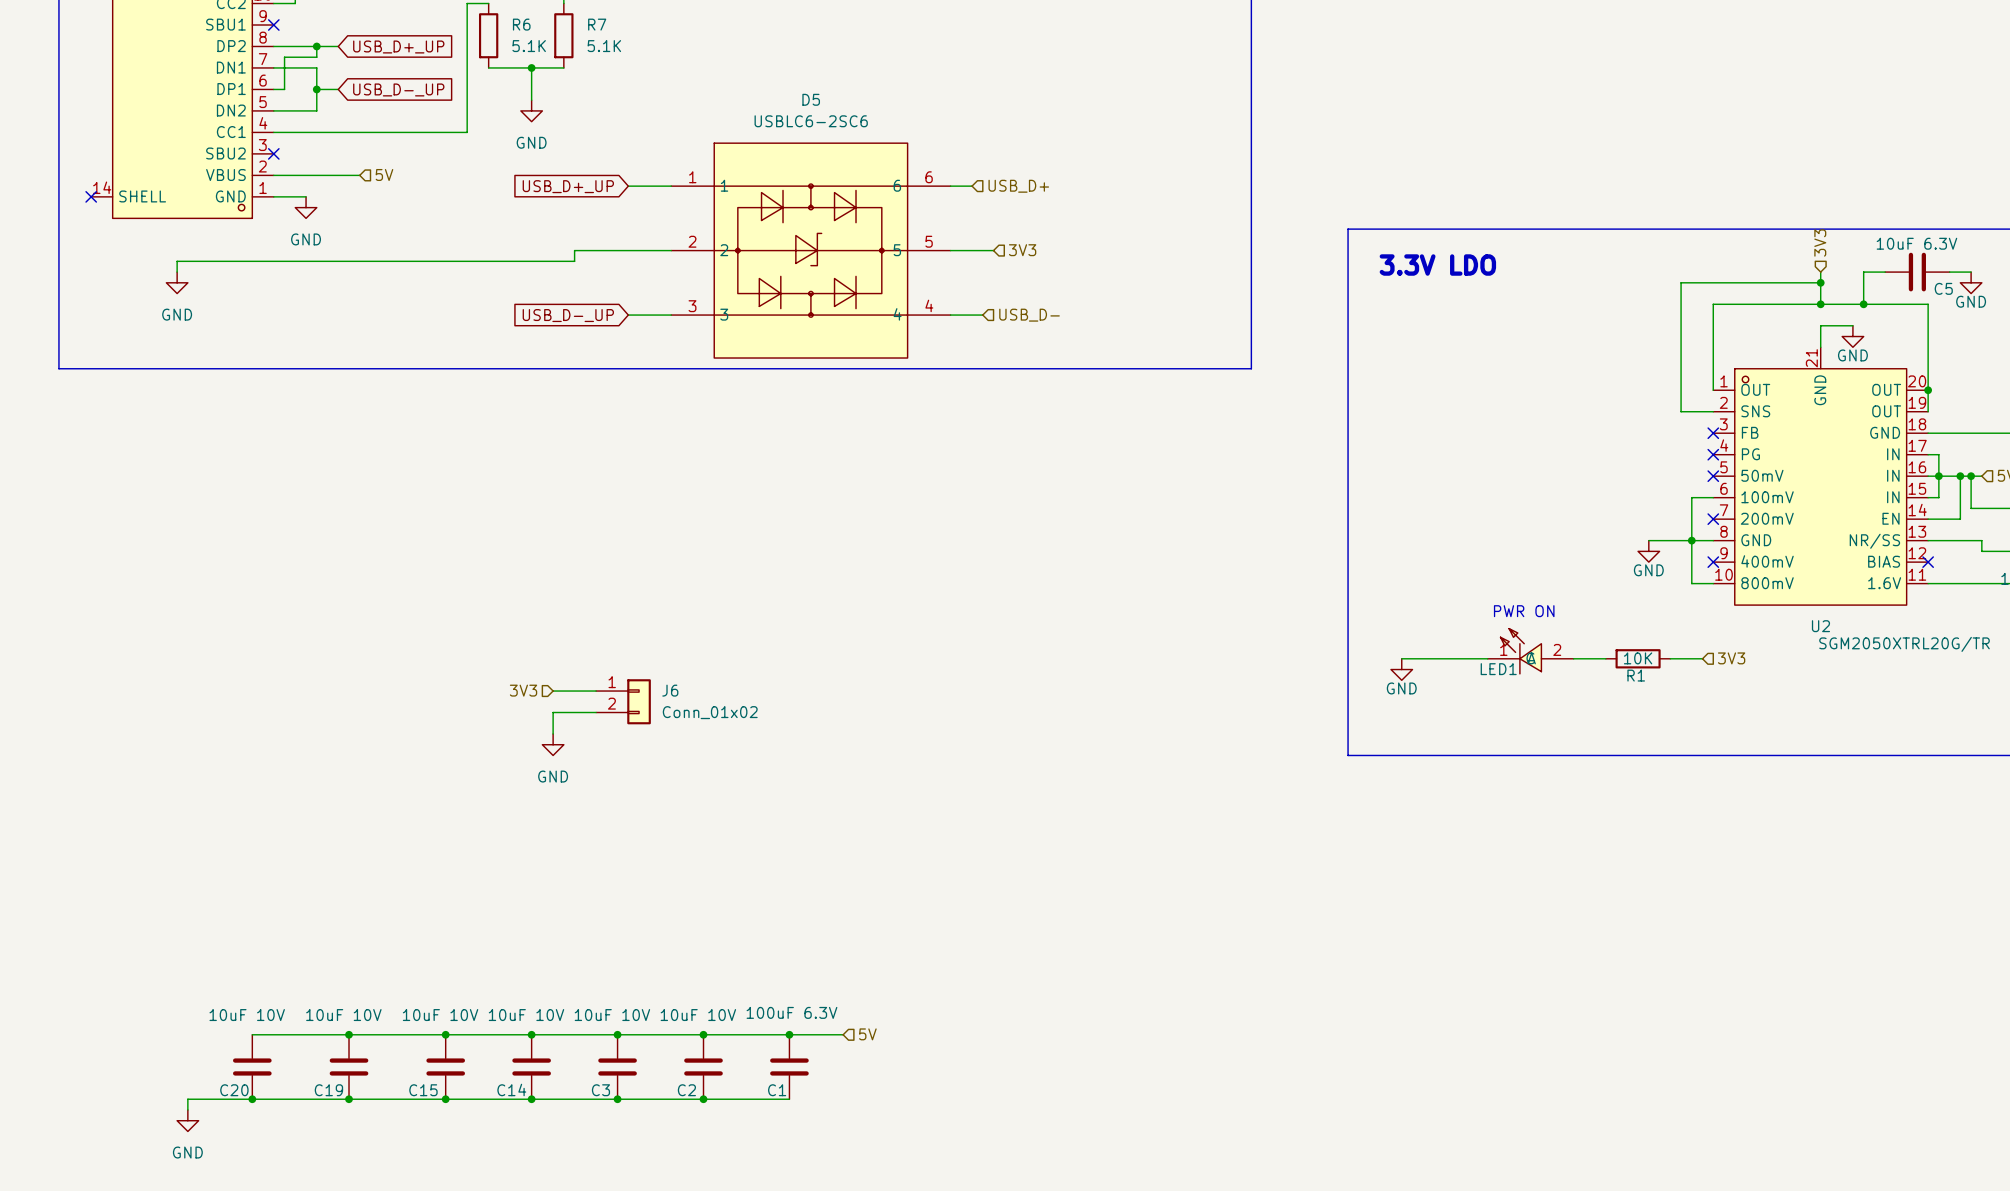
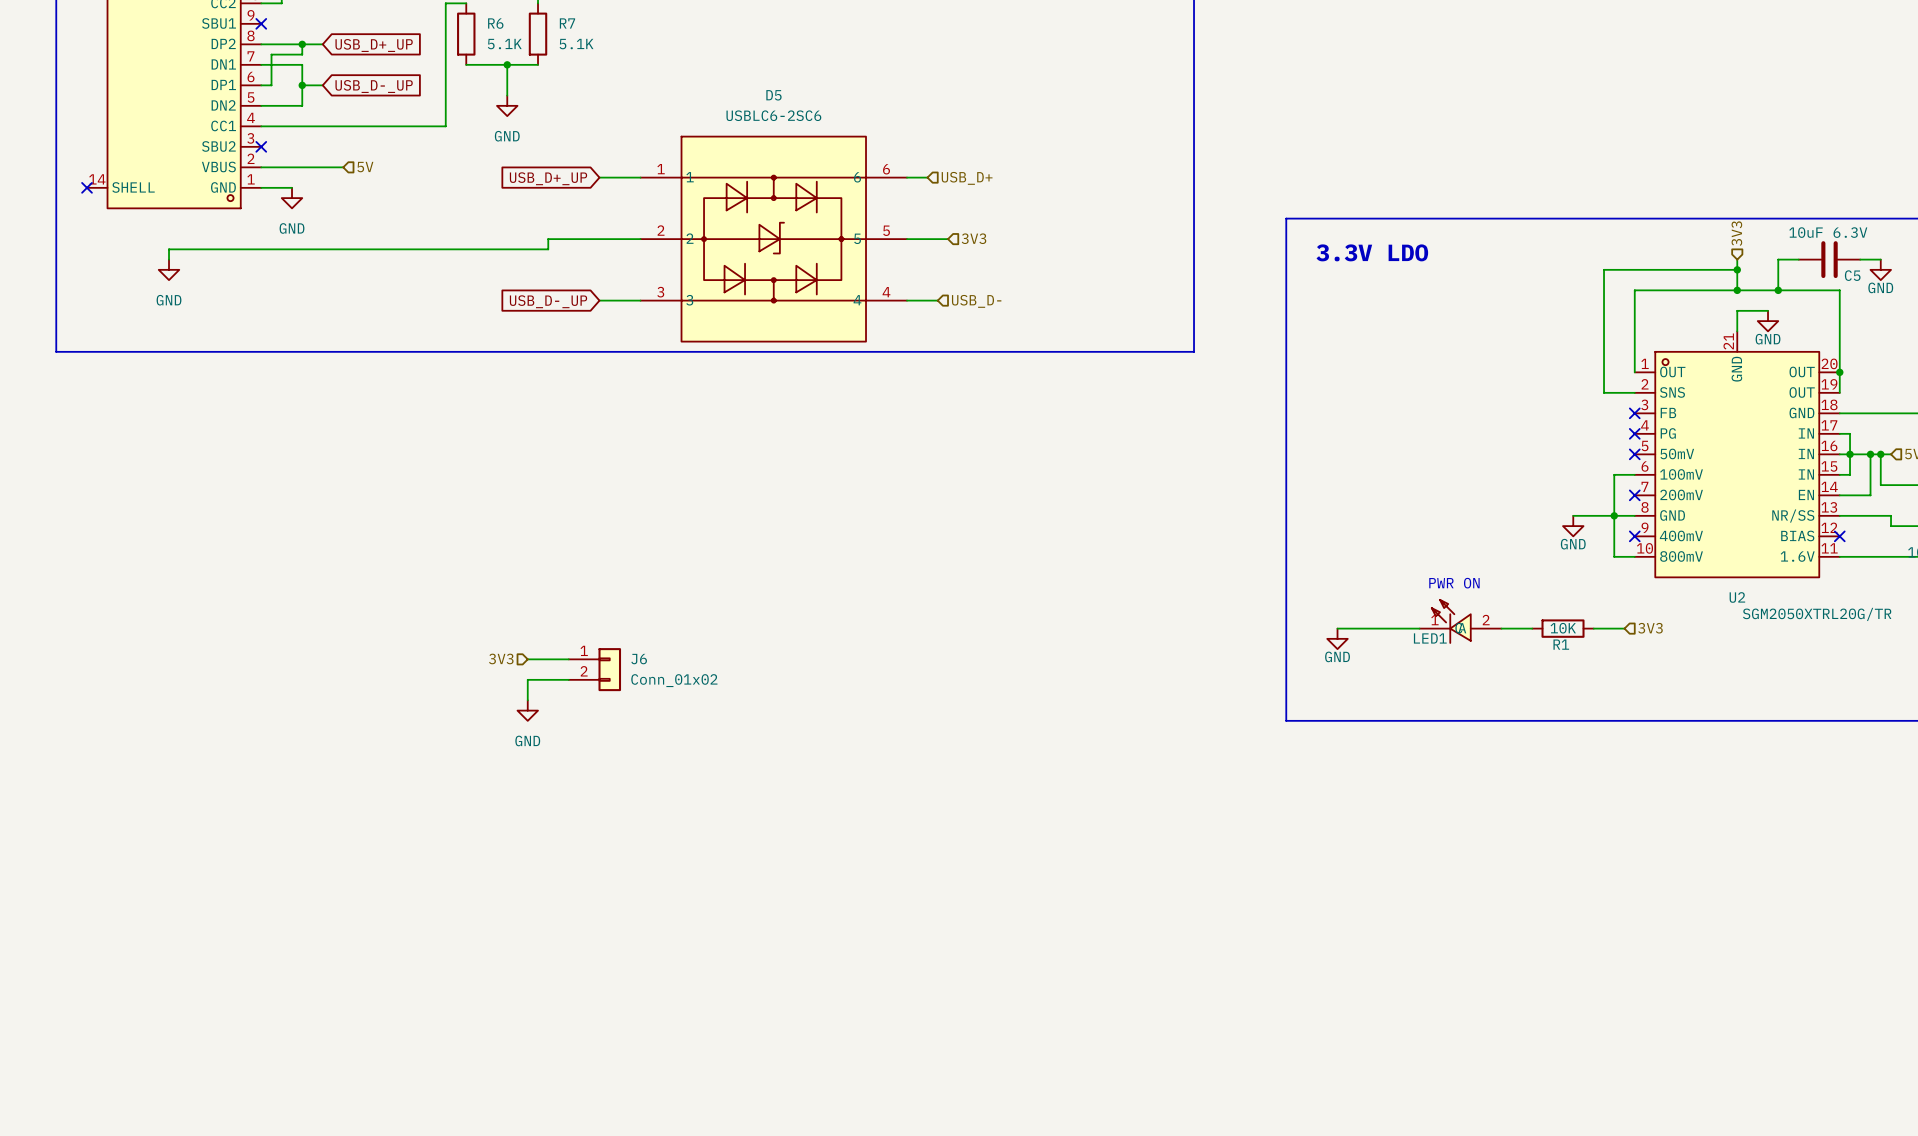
wire: (252, 1034) (843, 1034) -> none
junction: (349, 1034) -> none
junction: (445, 1034) -> none
junction: (531, 1034) -> none
junction: (617, 1034) -> none
junction: (703, 1034) -> none
junction: (789, 1034) -> none
hierarchical label: 5V (867, 1034) -> none
C20: 10uF 10V (252, 1067) -> none
C19: 10uF 10V (349, 1067) -> none
C15: 10uF 10V (445, 1067) -> none
C14: 10uF 10V (531, 1067) -> none
C3: 10uF 10V (617, 1067) -> none
C2: 10uF 10V (703, 1067) -> none
C1: 100uF 6.3V (789, 1067) -> none
junction: (252, 1099) -> none
junction: (349, 1099) -> none
junction: (445, 1099) -> none
junction: (531, 1099) -> none
junction: (617, 1099) -> none
junction: (703, 1099) -> none
wire: (789, 1099) (187, 1099) (187, 1109) -> none
power symbol: GND (187, 1120) -> none

